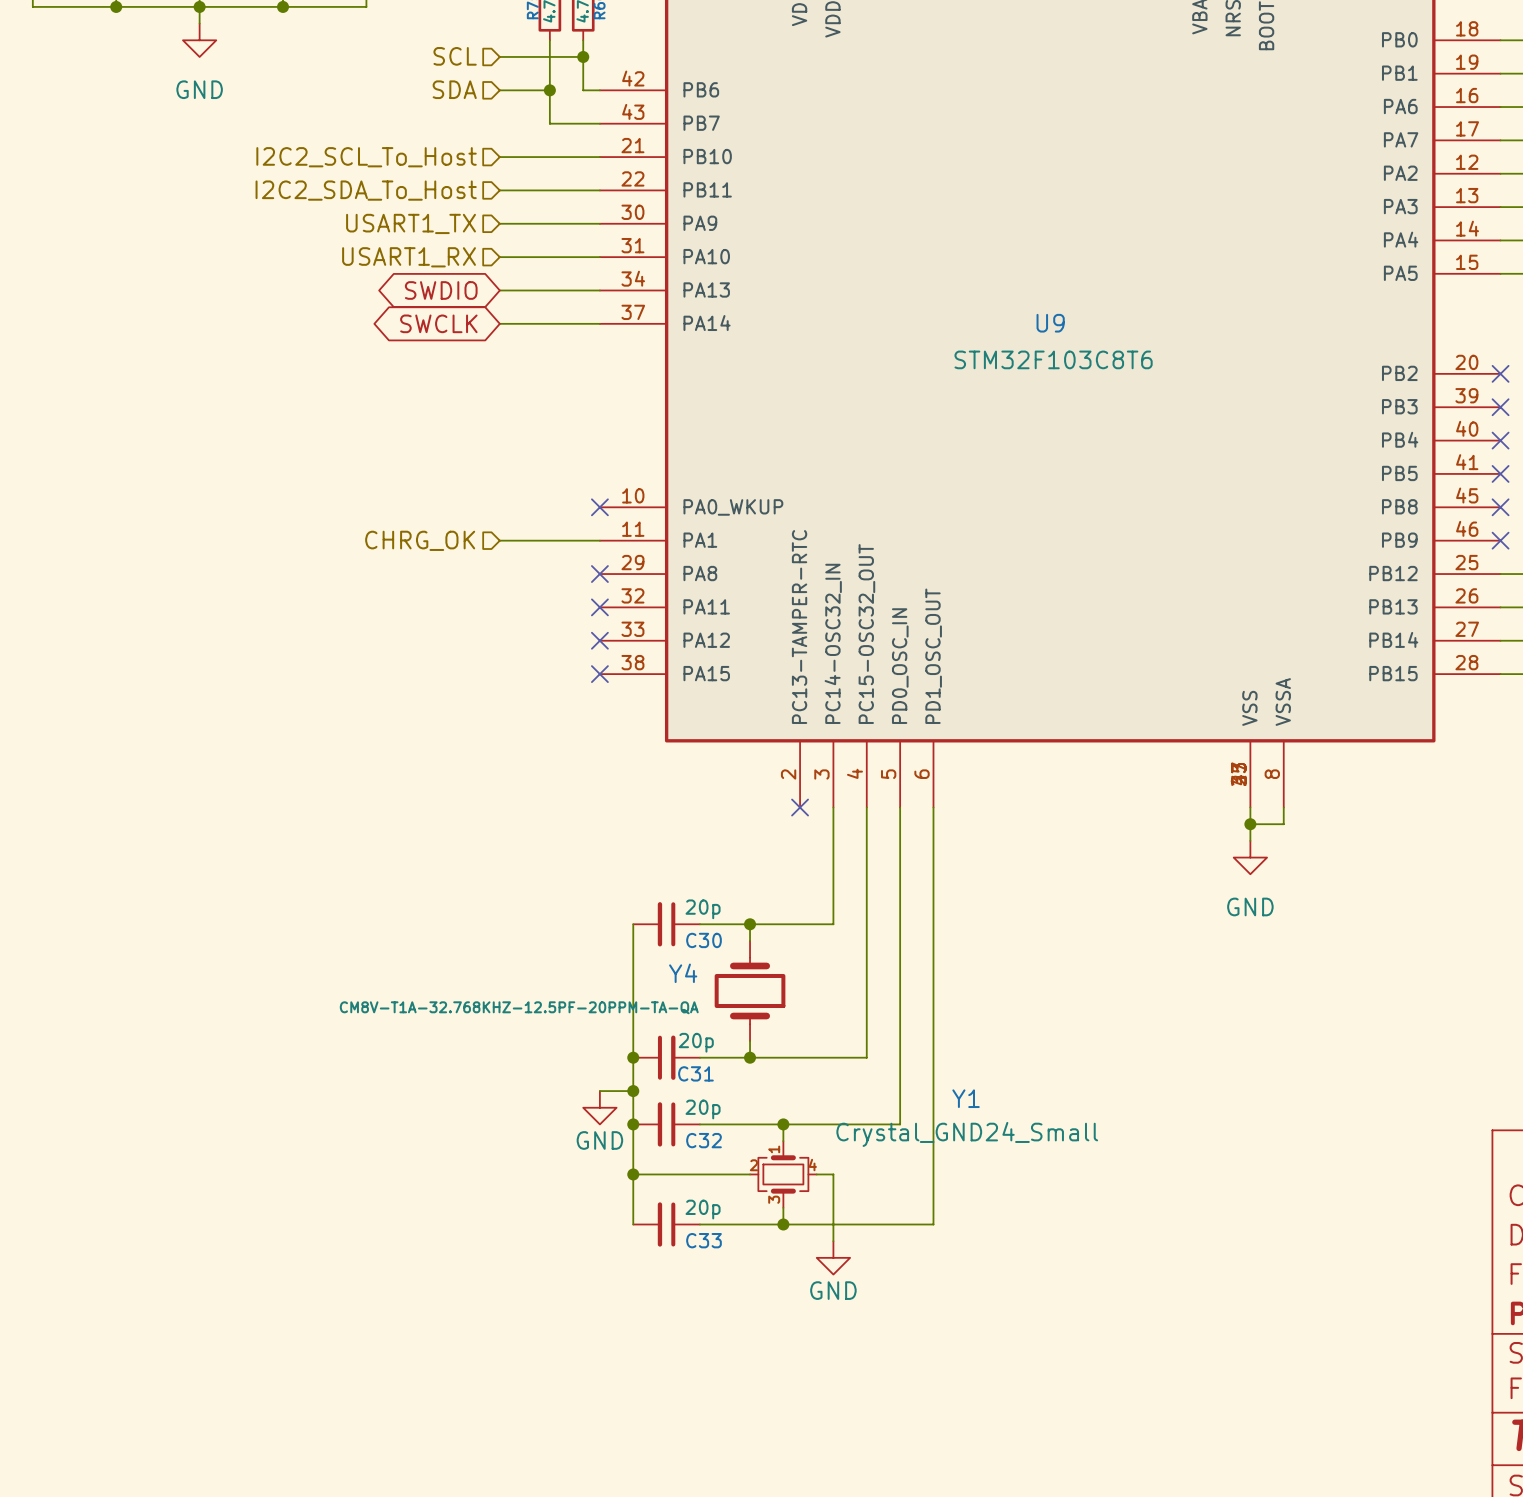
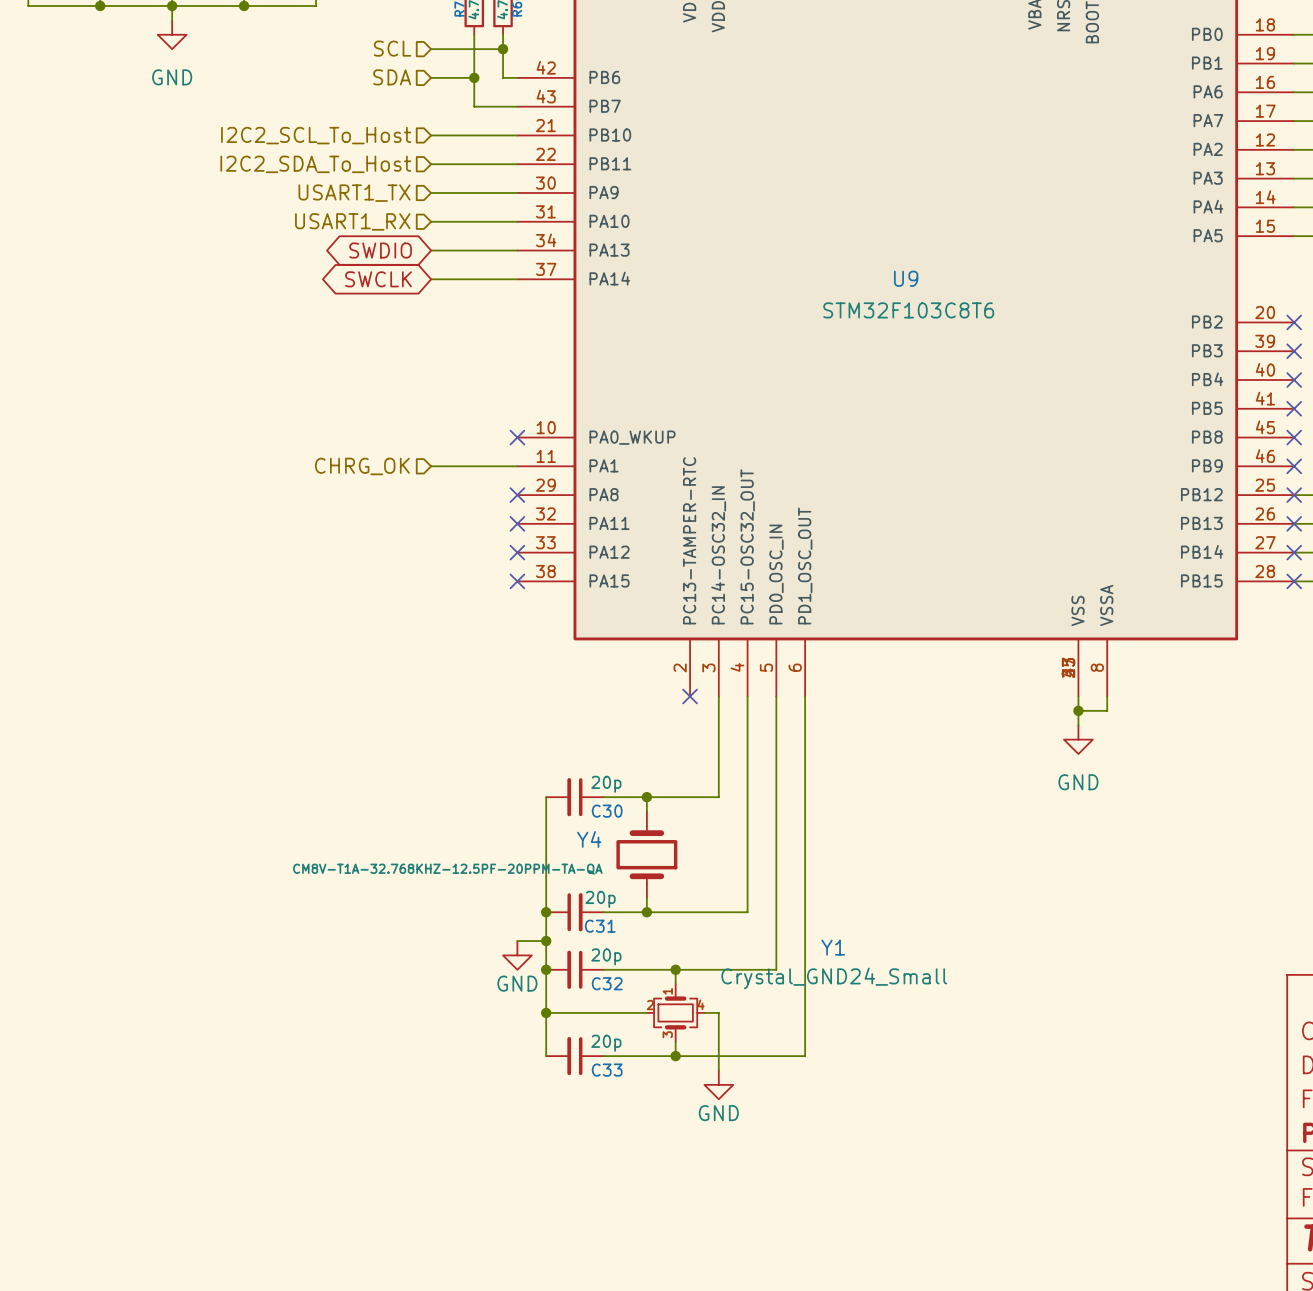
no-connect mark: none -> (1294, 495)
no-connect mark: none -> (1294, 523)
no-connect mark: none -> (1294, 552)
no-connect mark: none -> (1294, 581)

